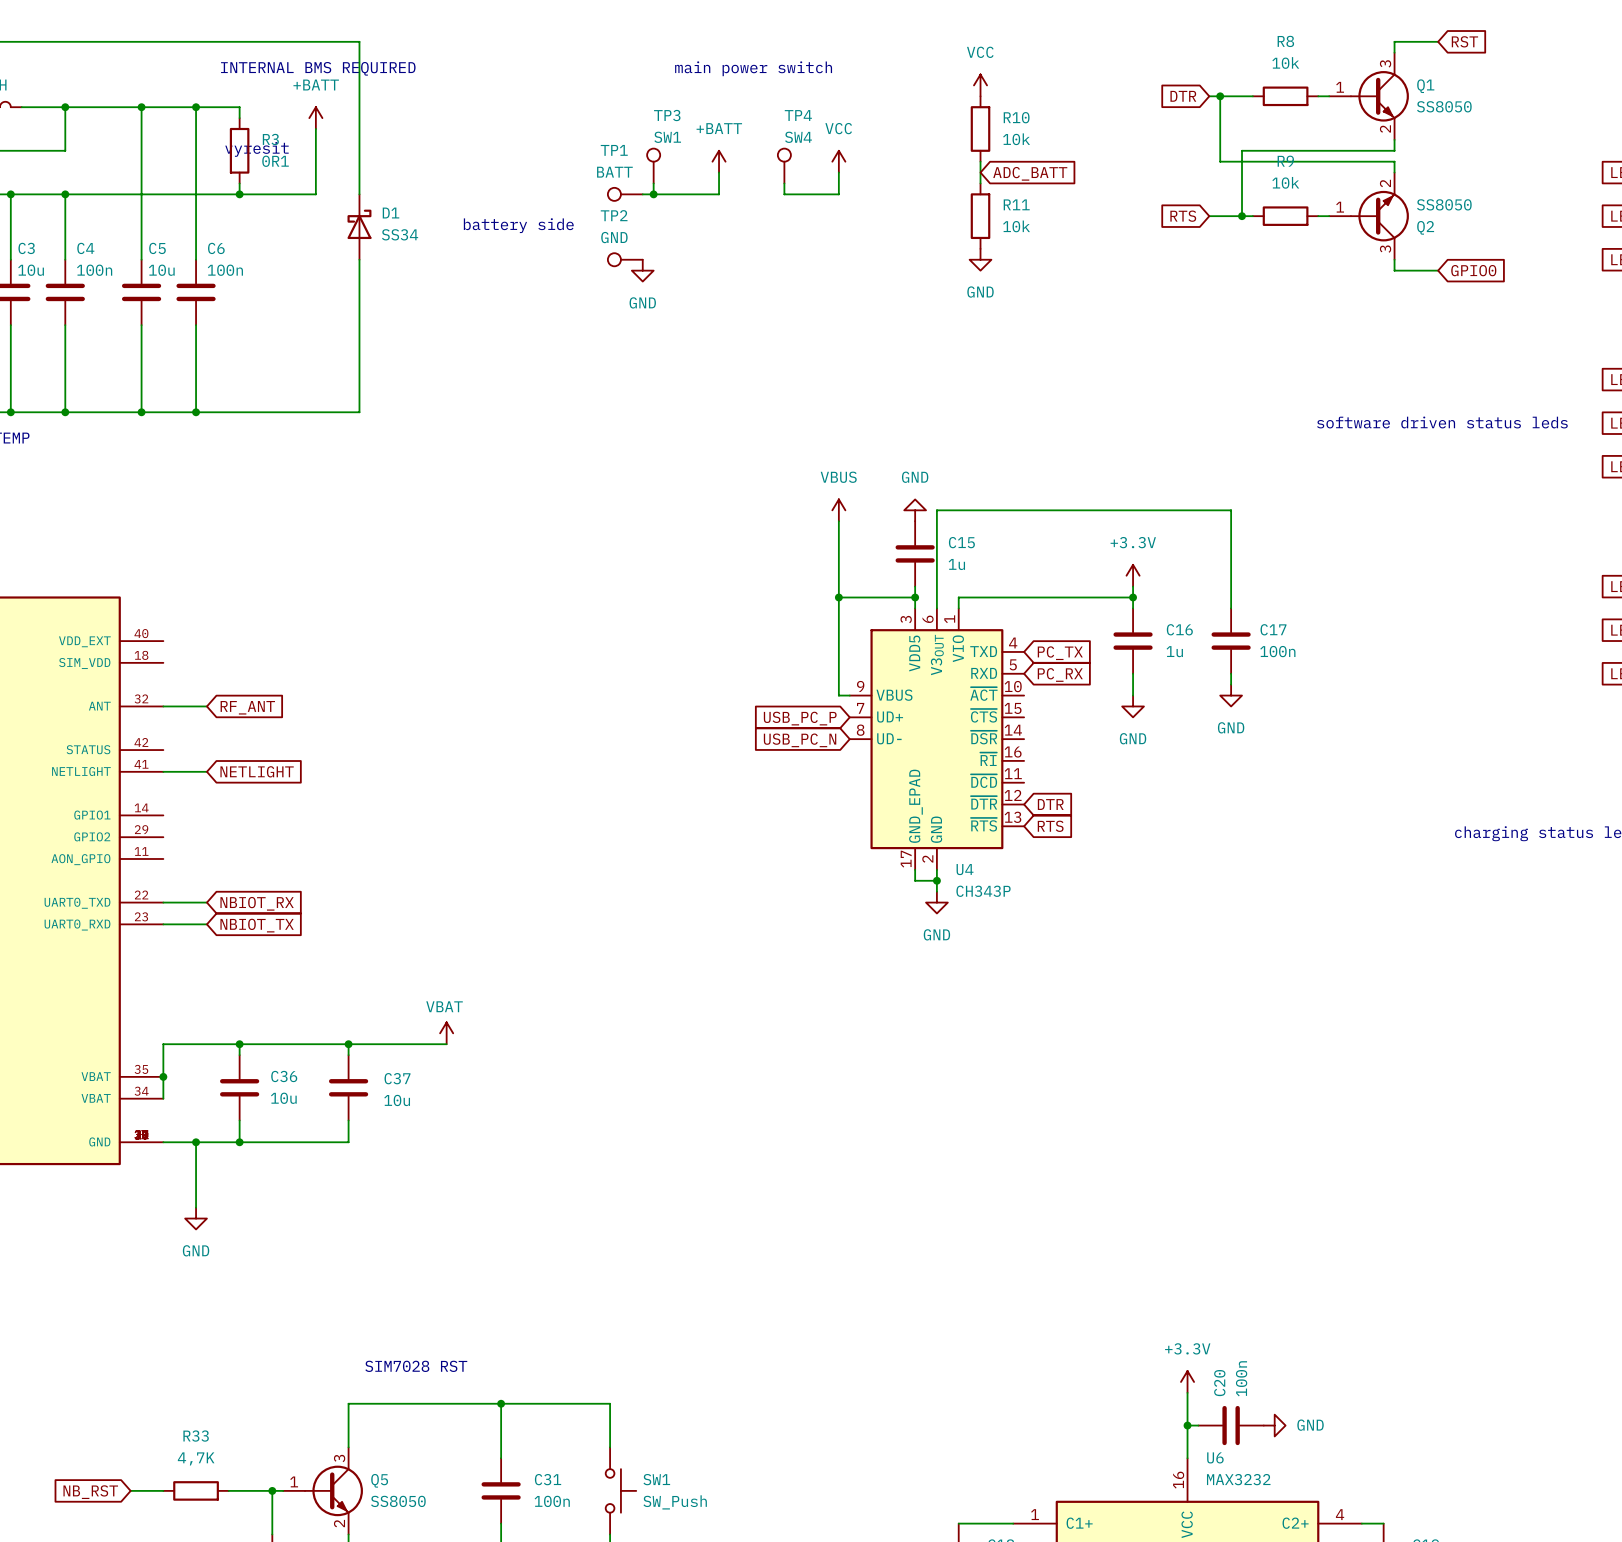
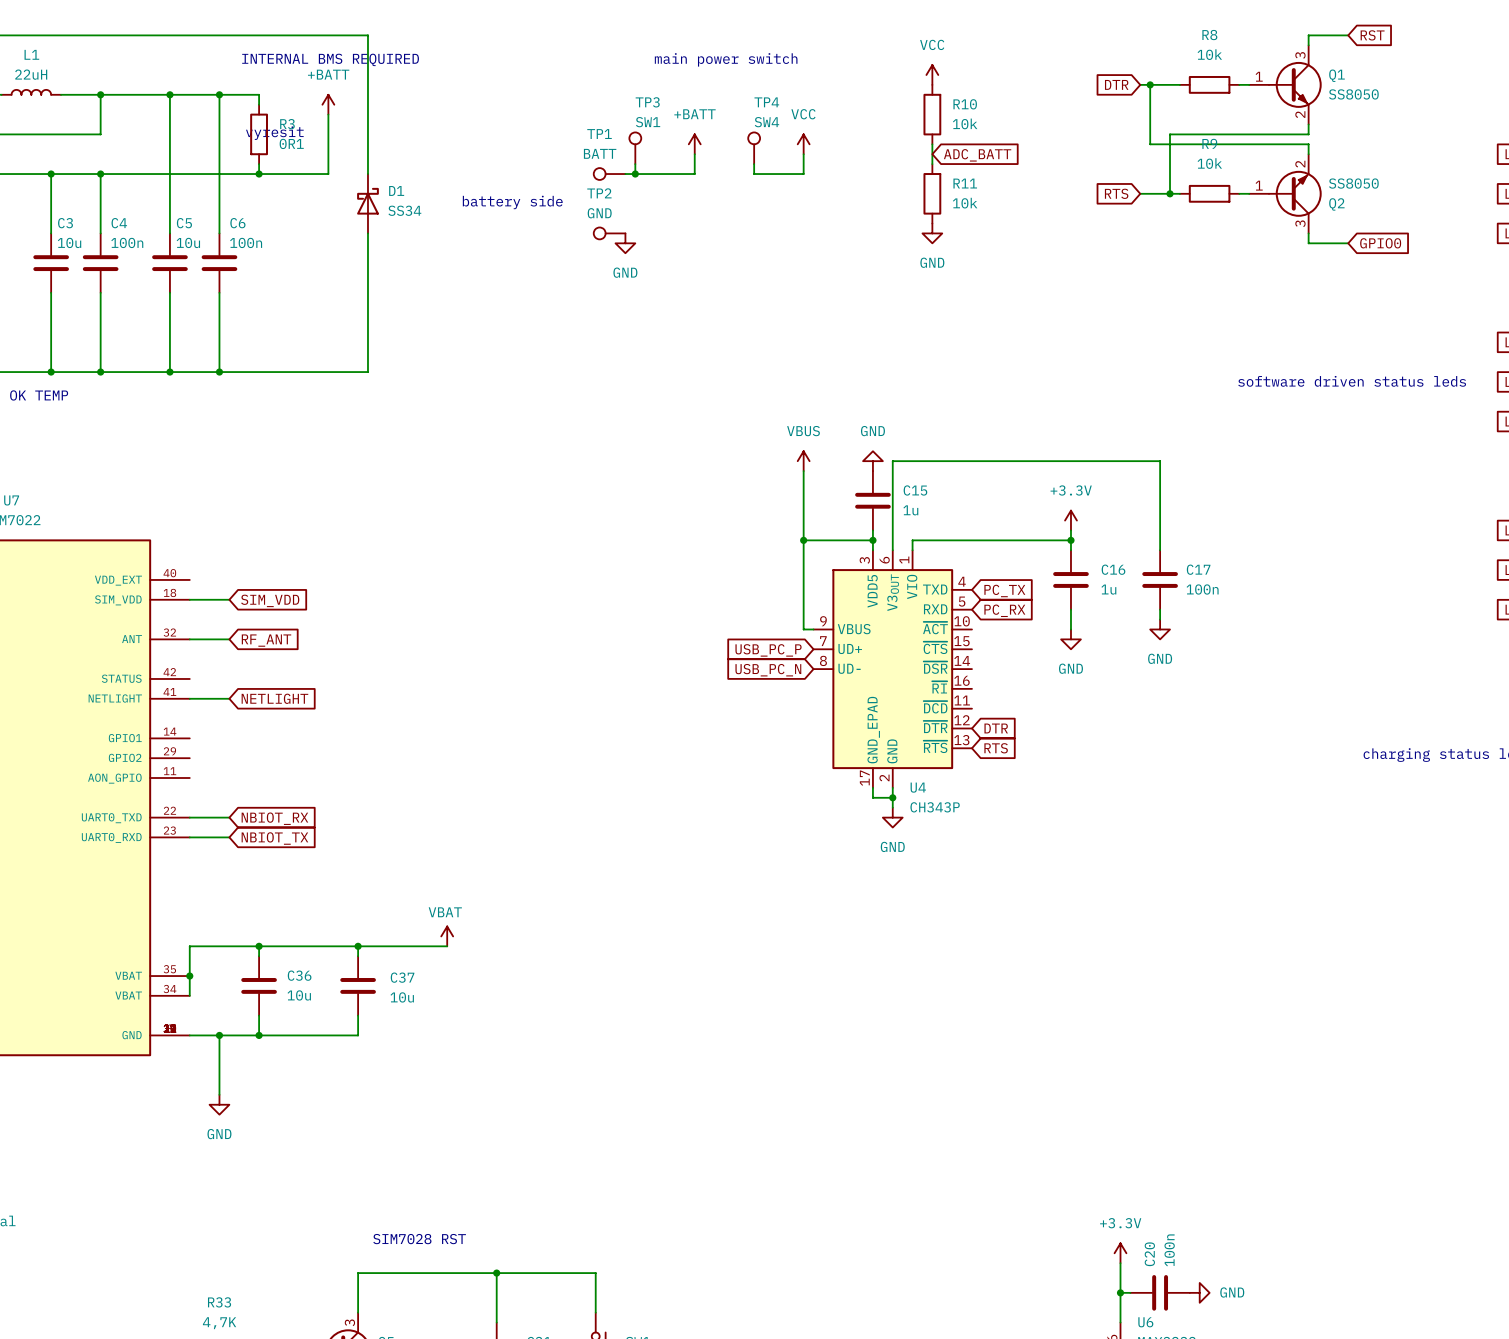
wire: none -> (189, 599) (229, 599)
global label: none -> SIM_VDD (270, 600)

